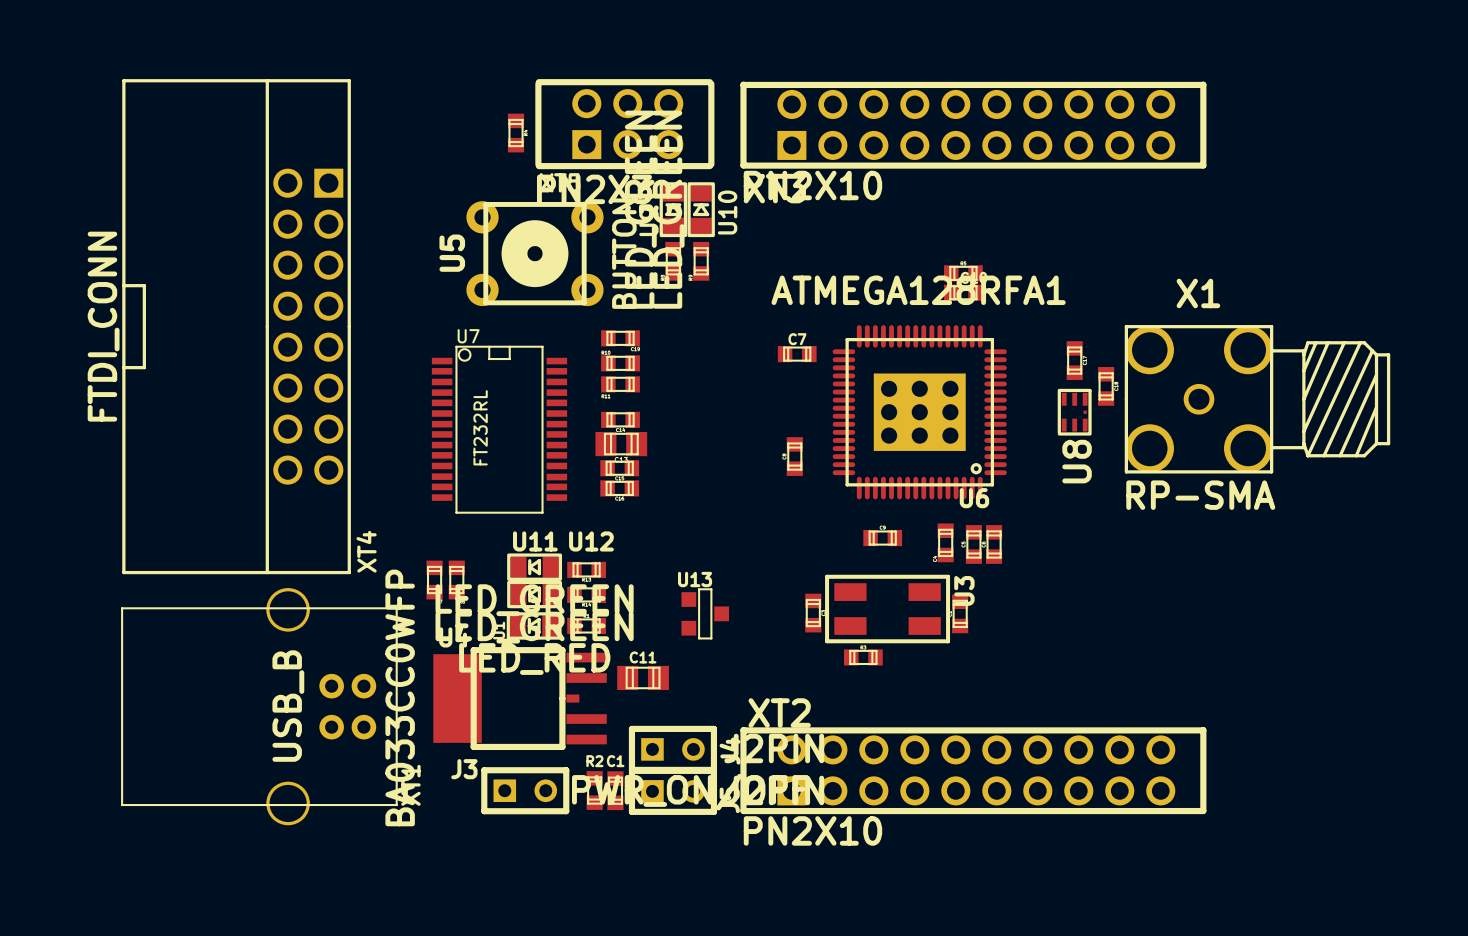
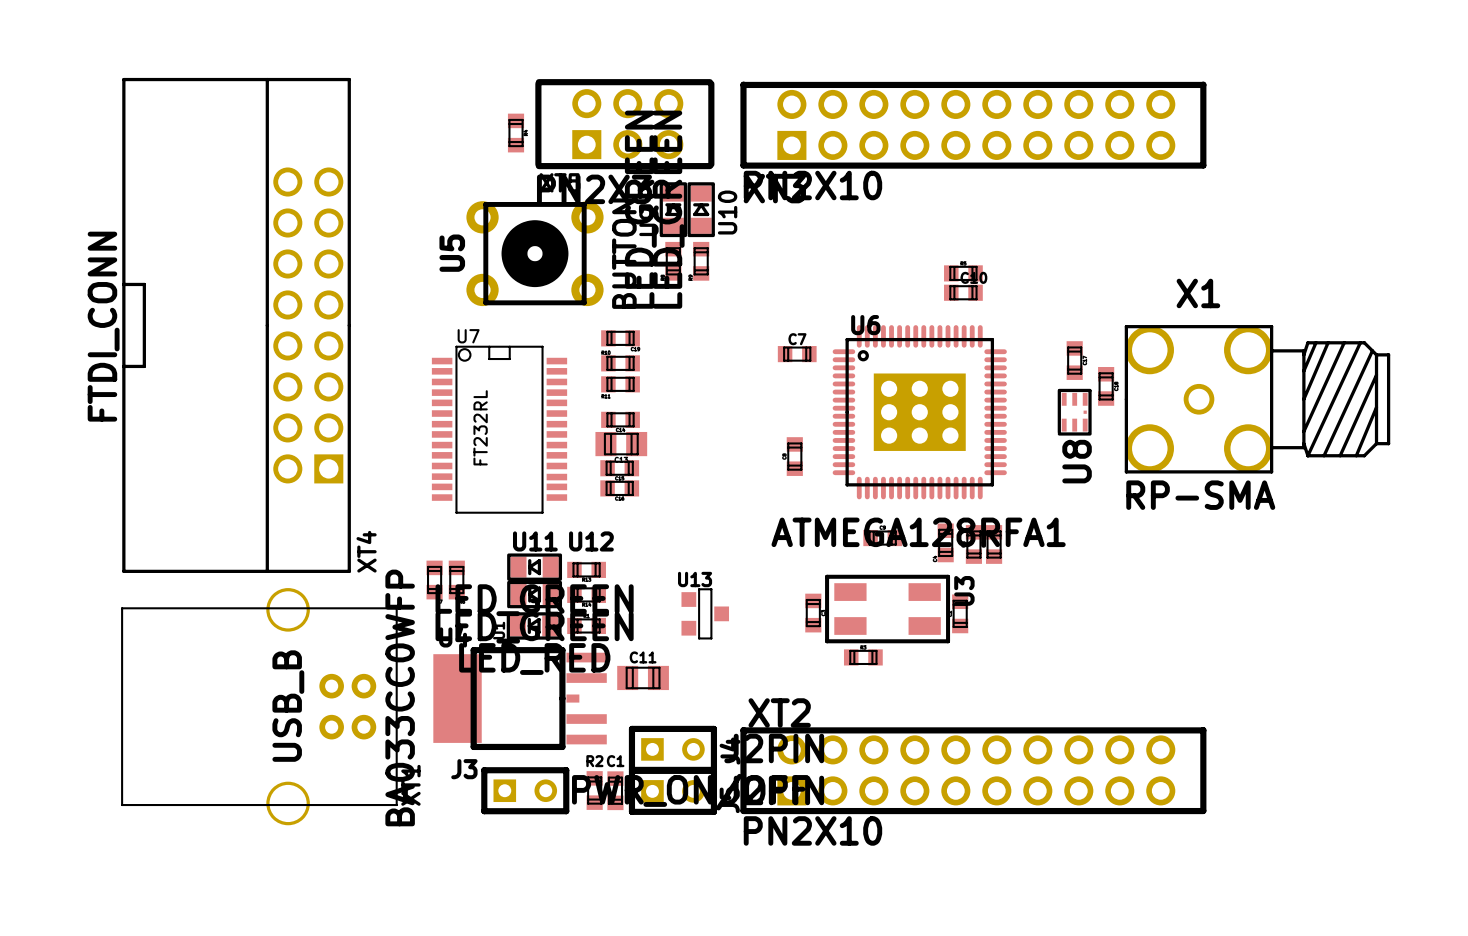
XT4 footprint: [122, 79, 351, 575] -> [122, 77, 351, 573]
U6 rotation: 0° (919, 412) -> 180° (919, 412)

